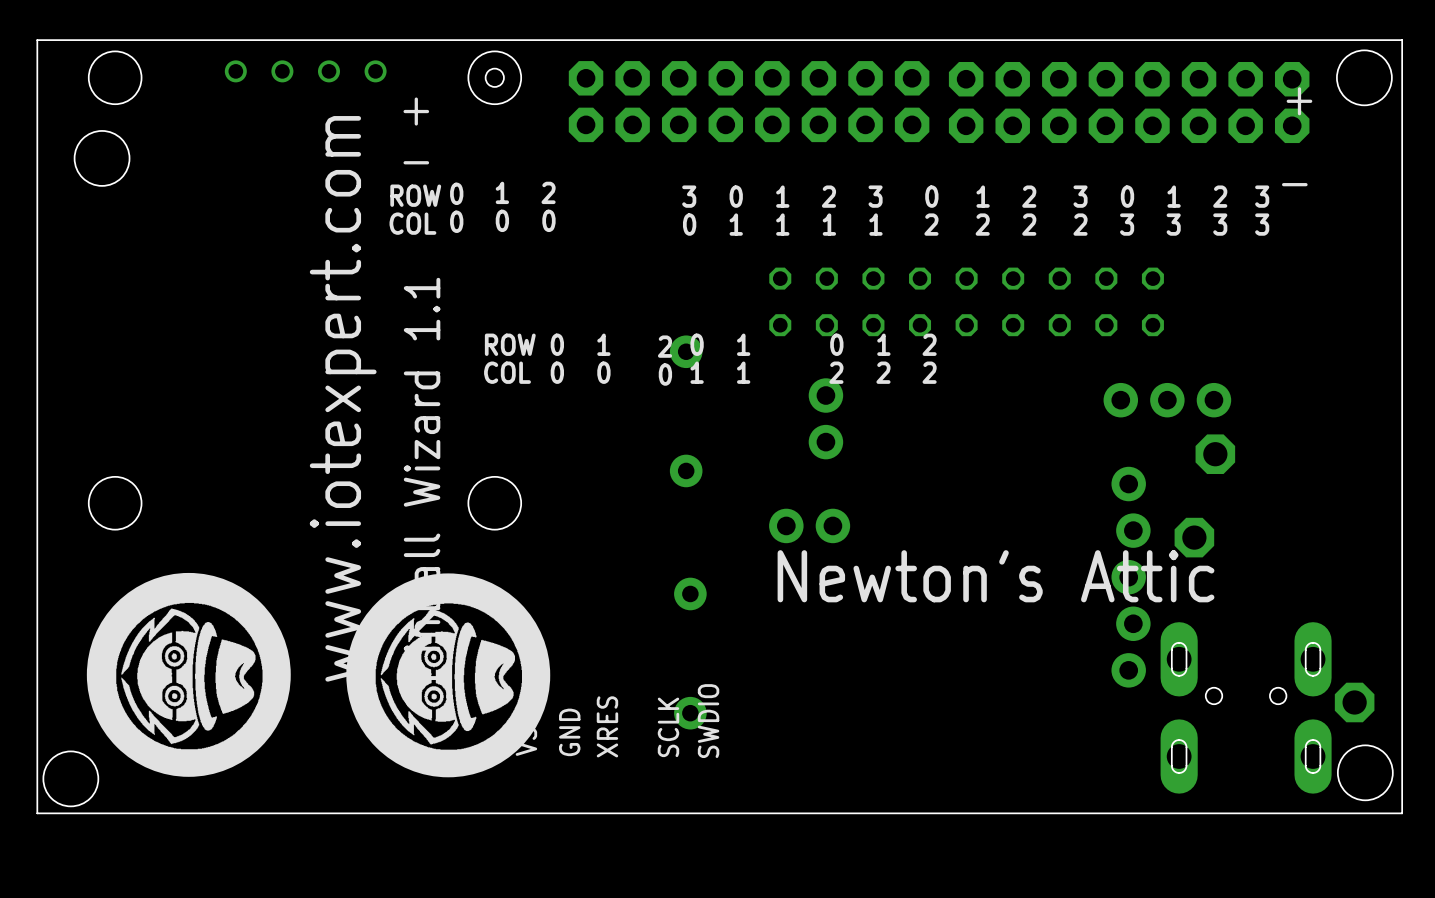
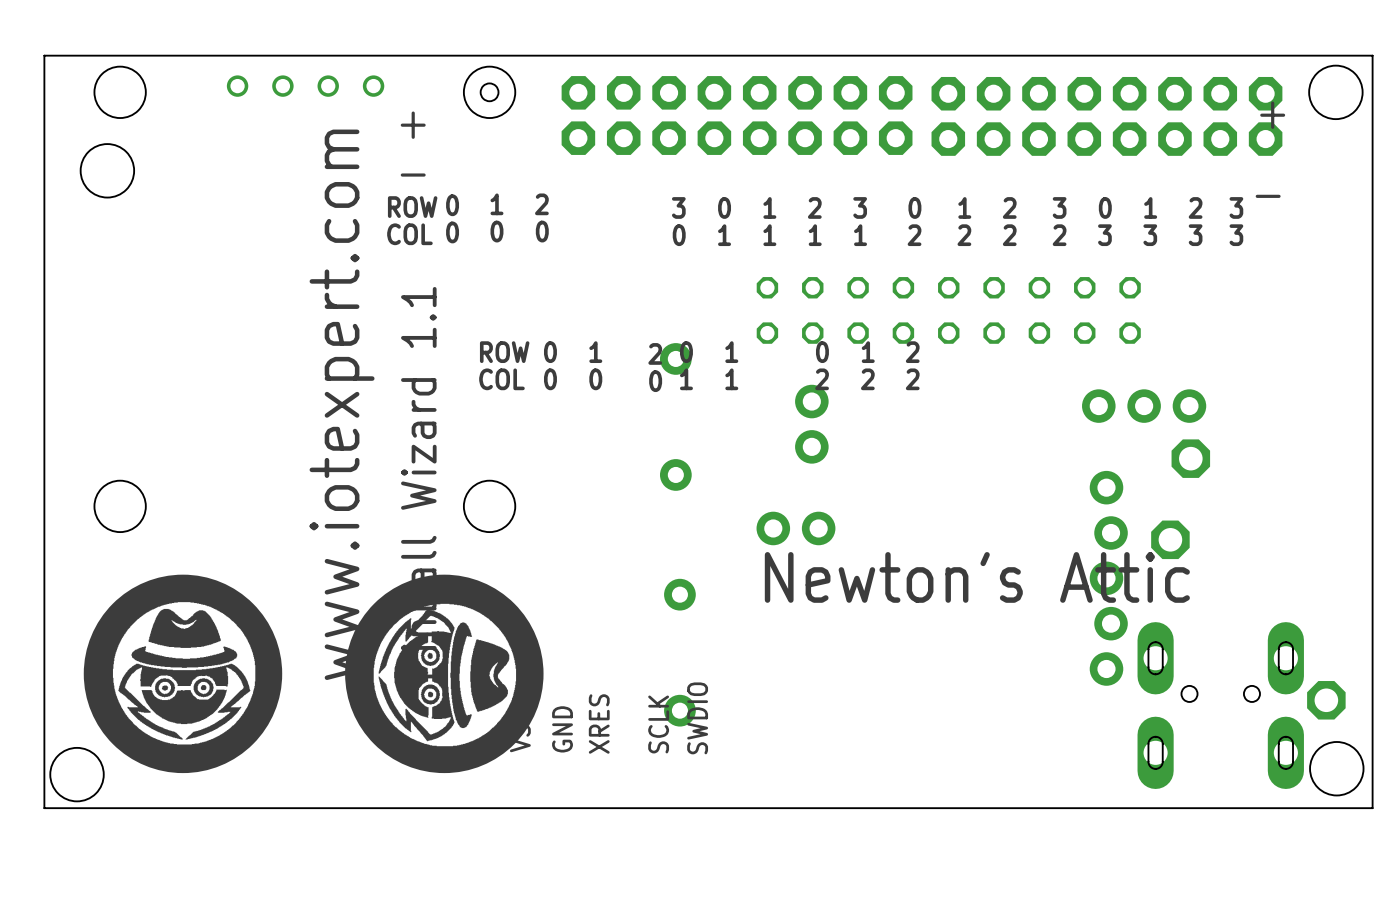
part rotation: 0° (188, 674) -> 90° counterclockwise (182, 673)

